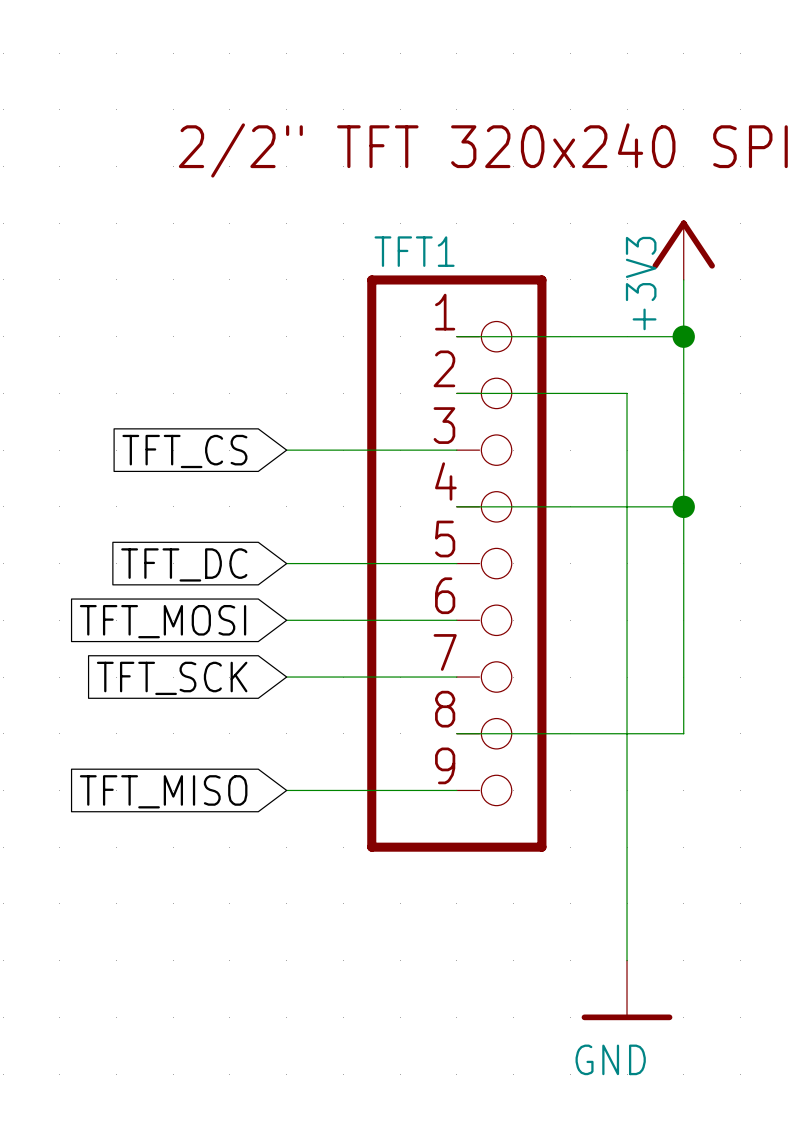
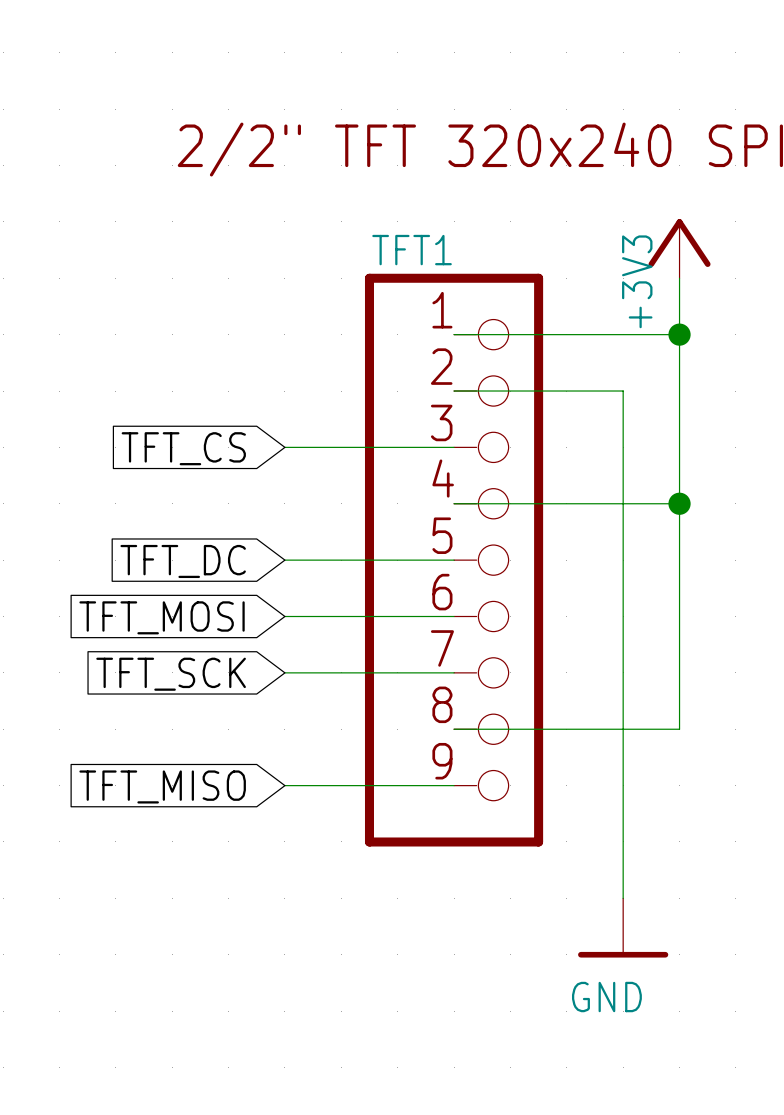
power symbol position: GND (627, 990) -> GND (623, 927)

